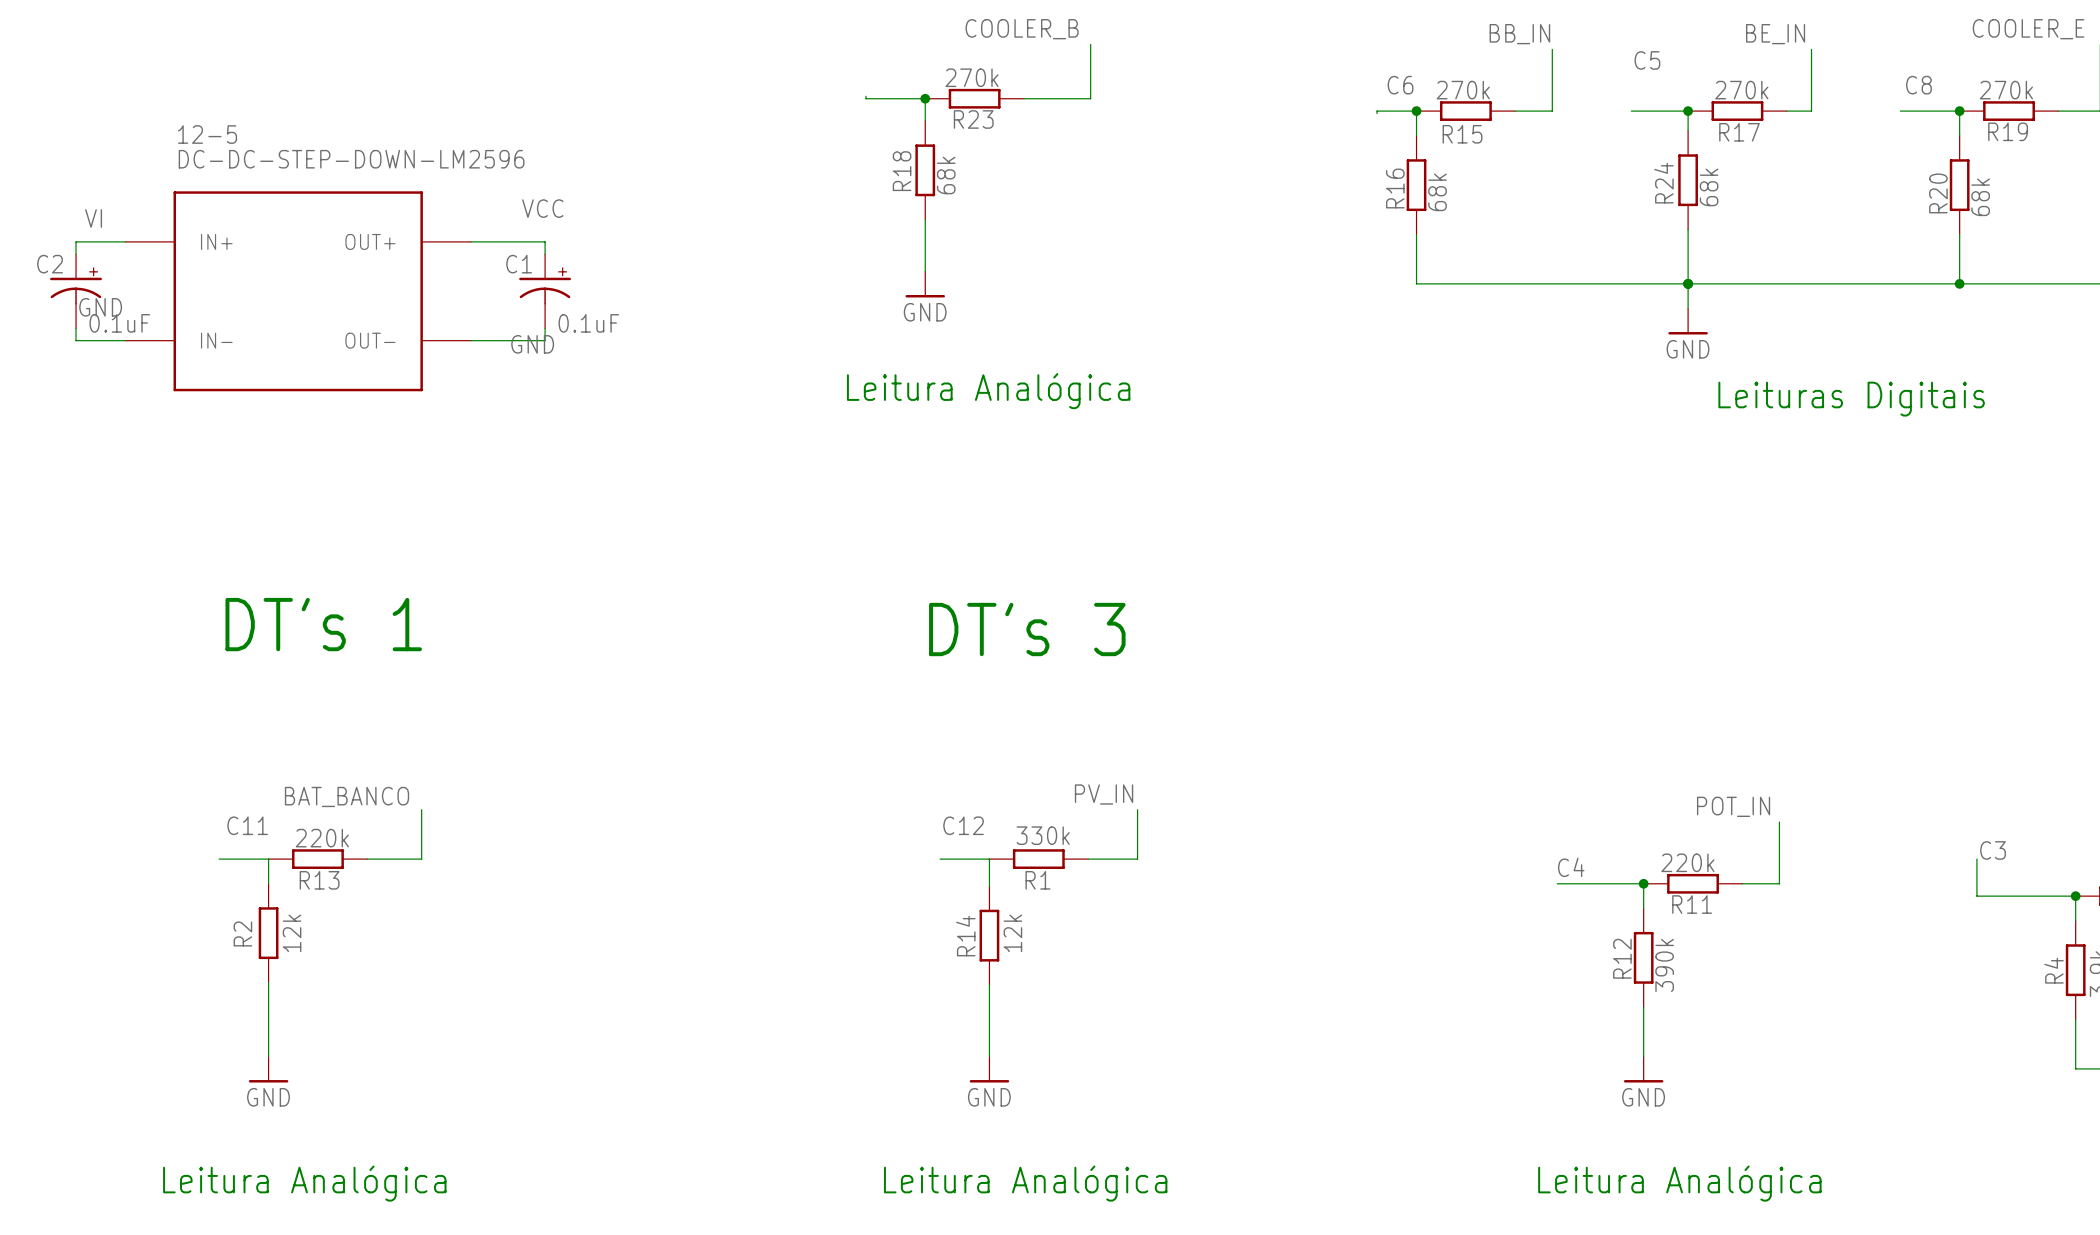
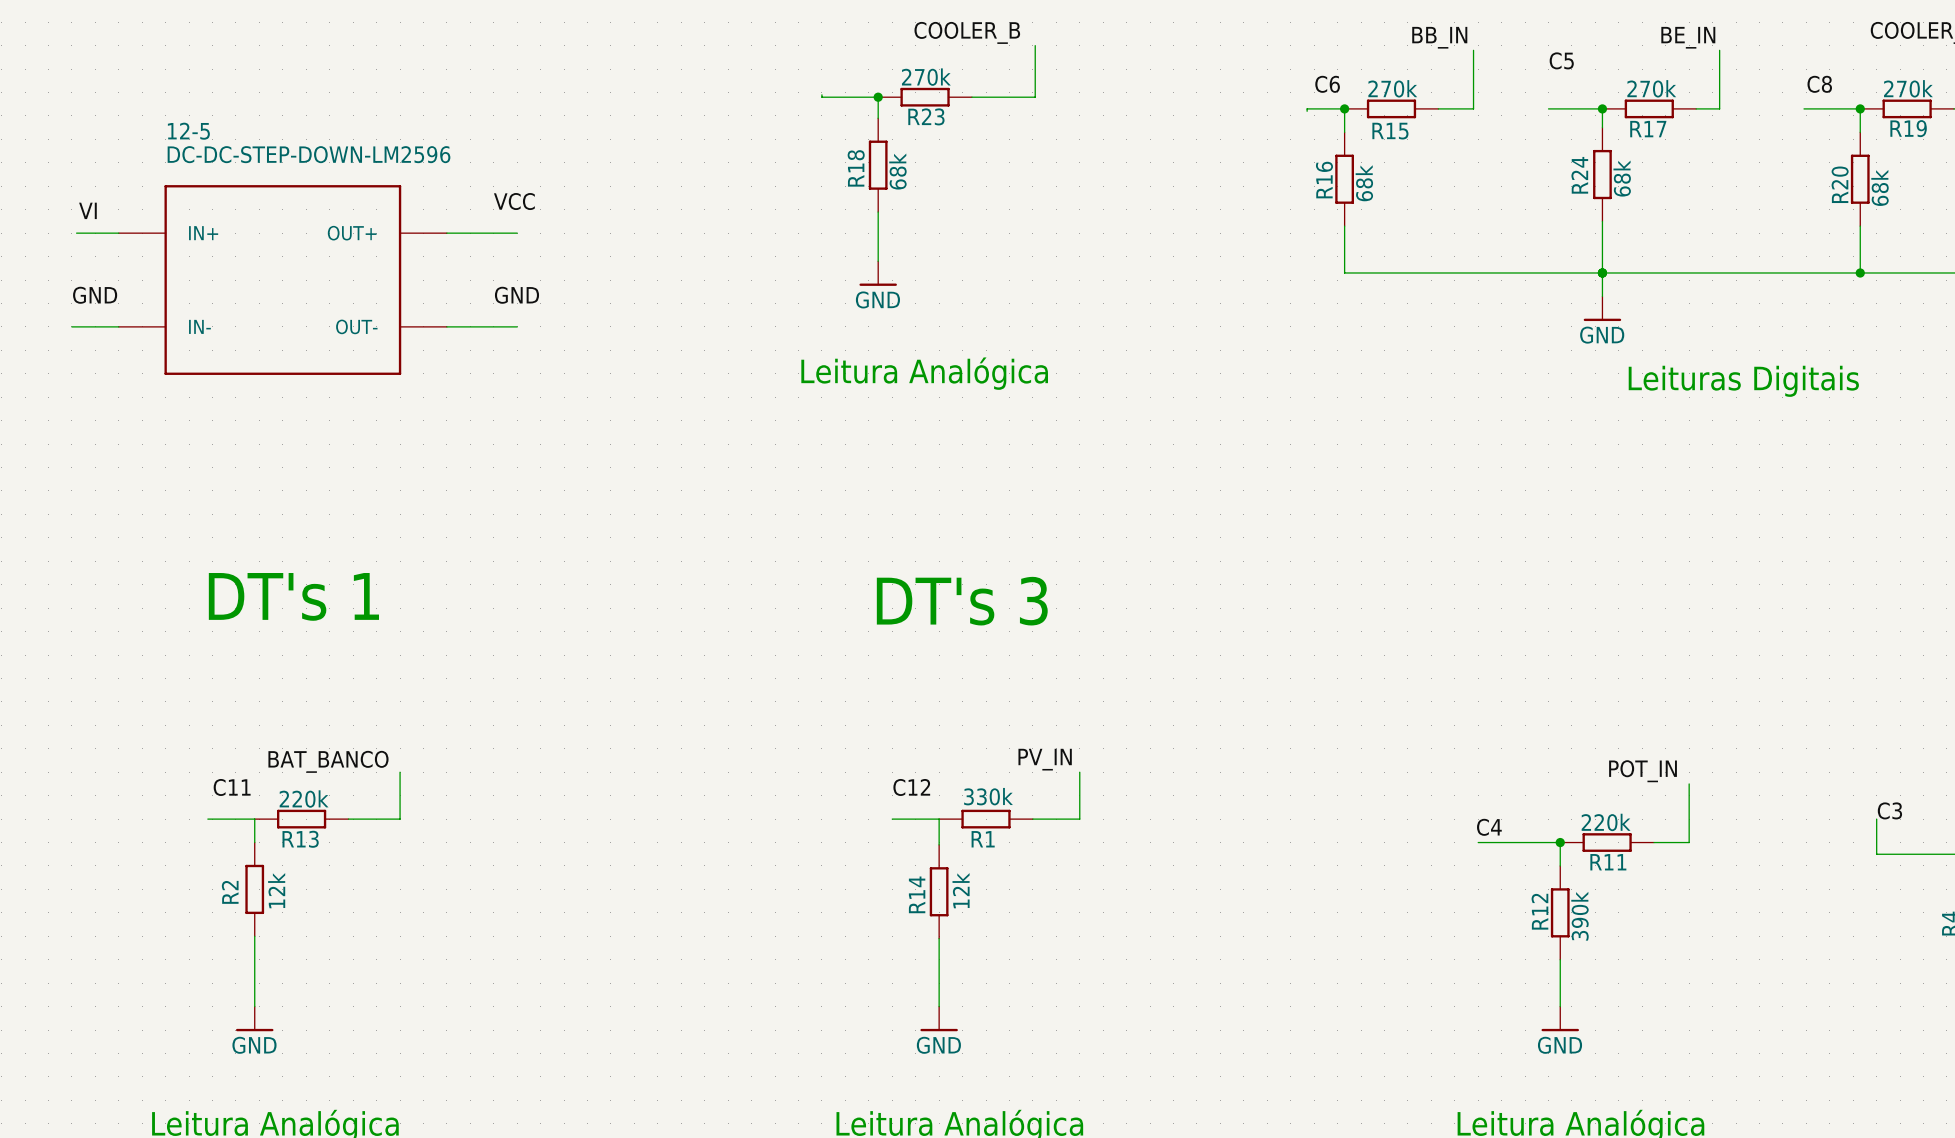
wire: (80, 241) (76, 241) (76, 254) -> none
wire: (545, 241) (545, 254) -> none
C2: 0.1uF (76, 291) -> none
C1: 0.1uF (545, 291) -> none
wire: (76, 328) (76, 340) -> none
wire: (545, 328) (545, 340) -> none
label position: GND (532, 344) -> GND (516, 295)

